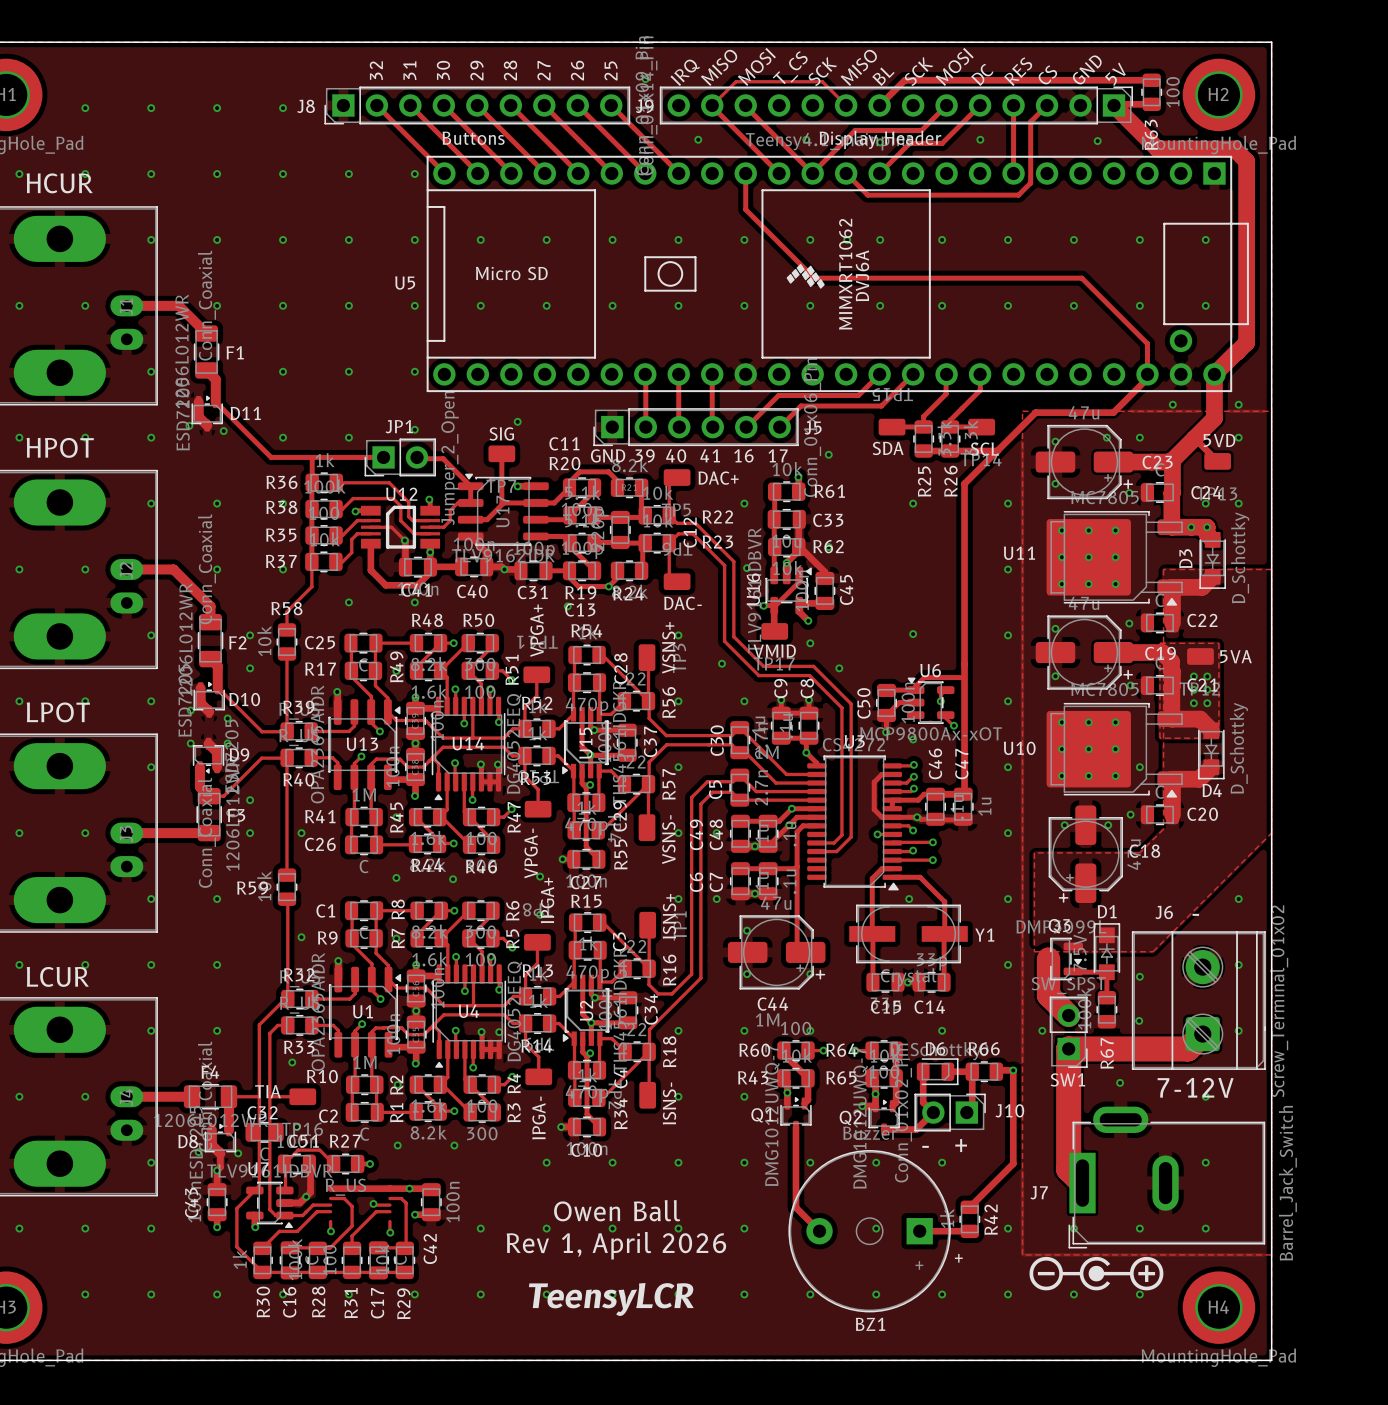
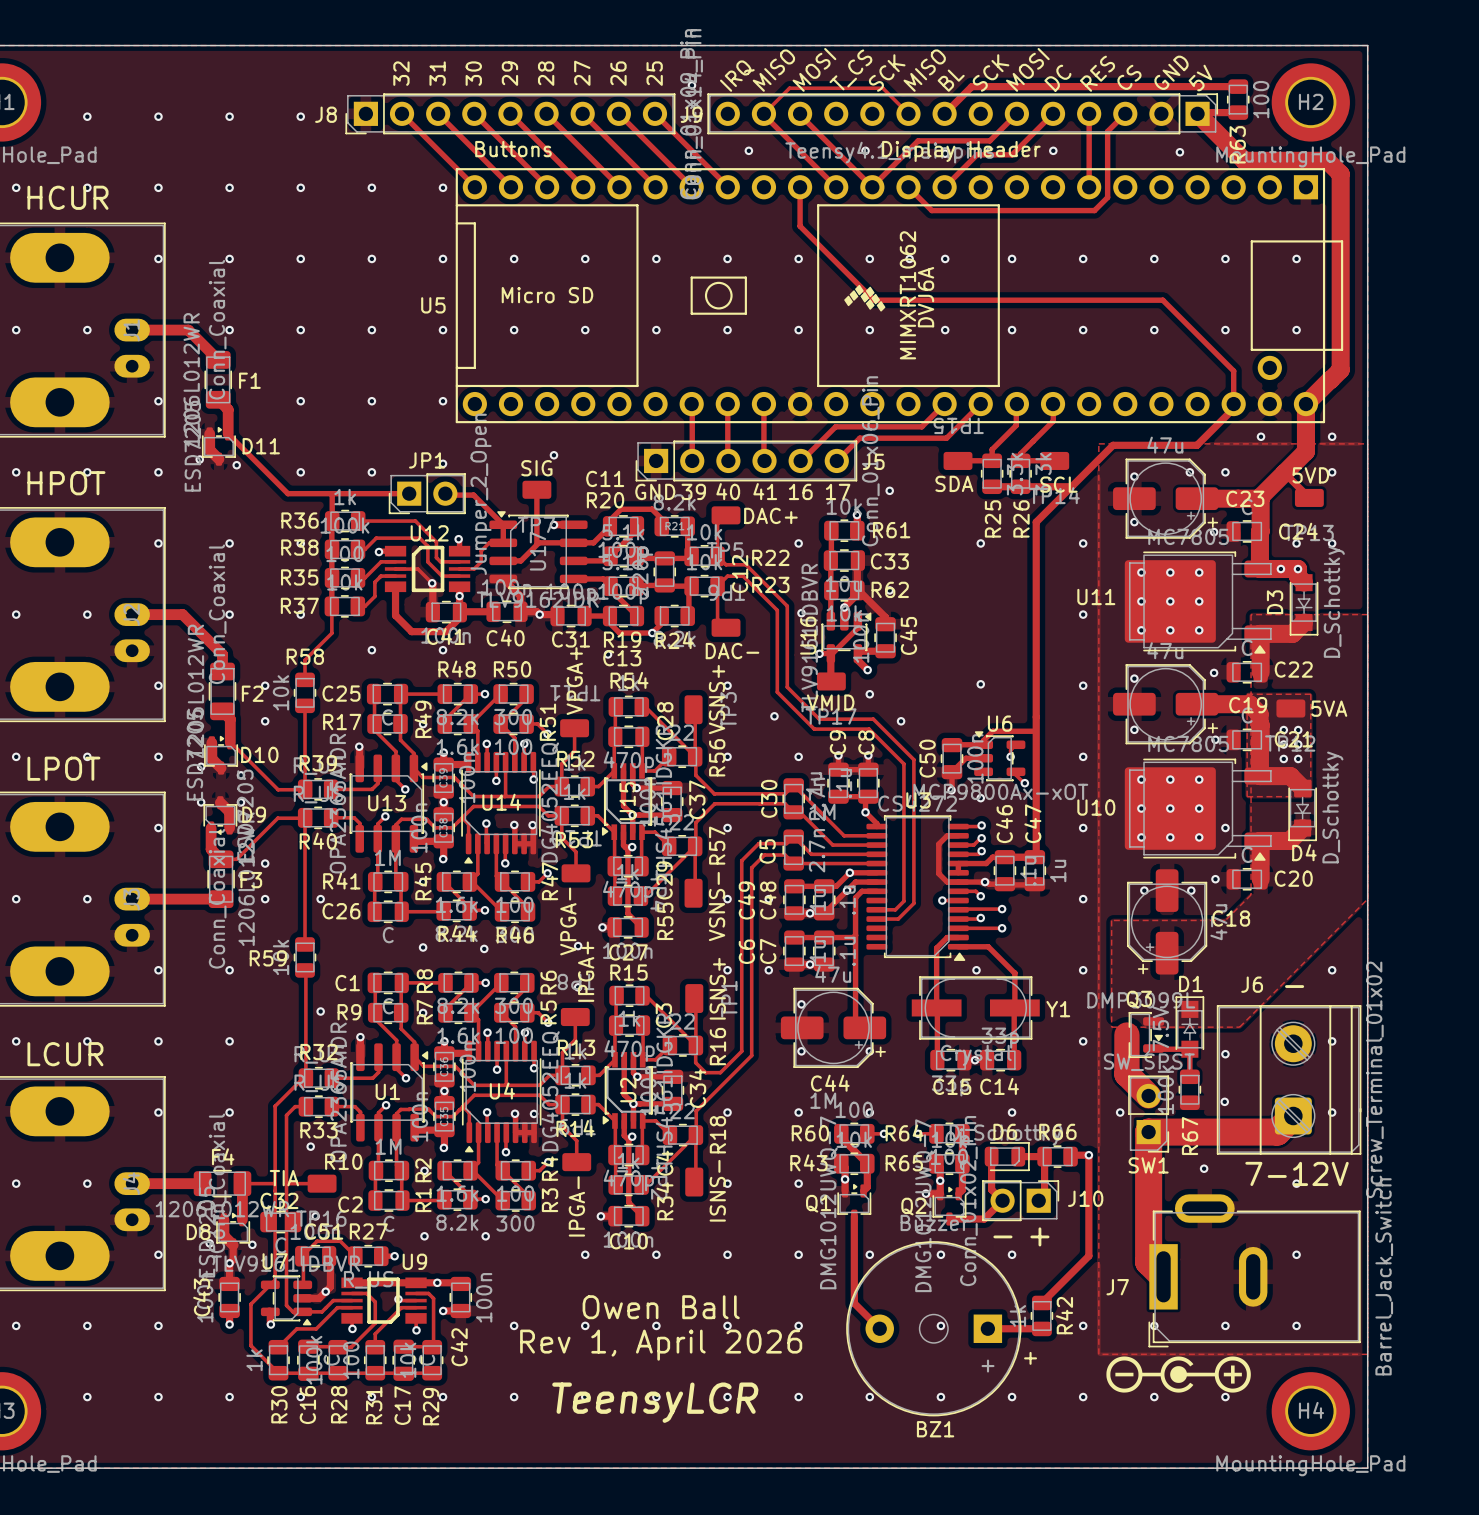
U9: none -> (384, 1300)

